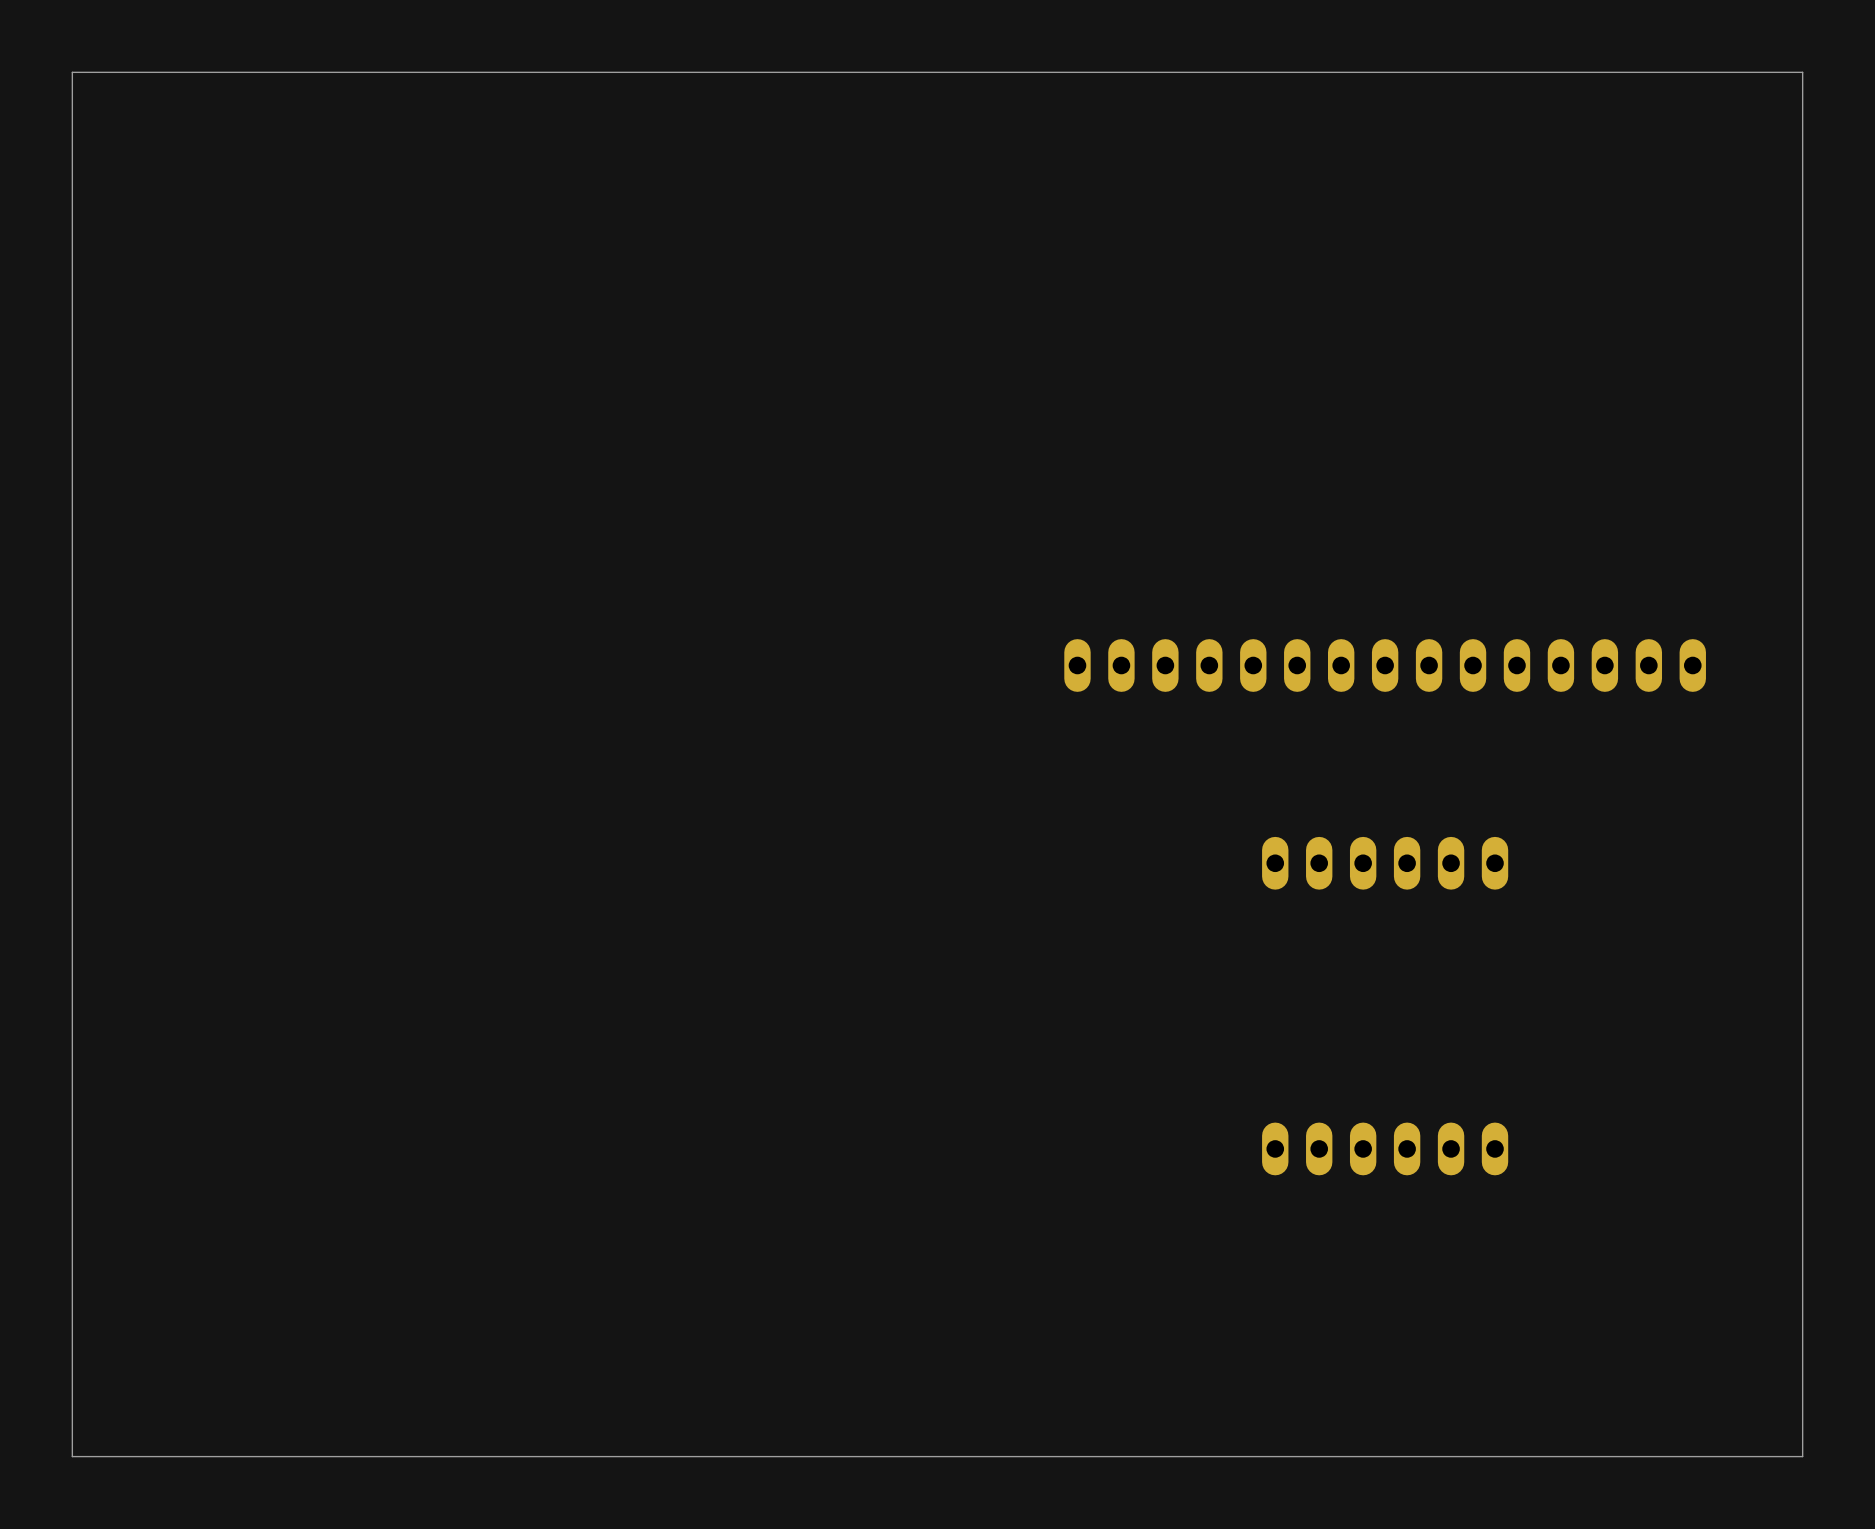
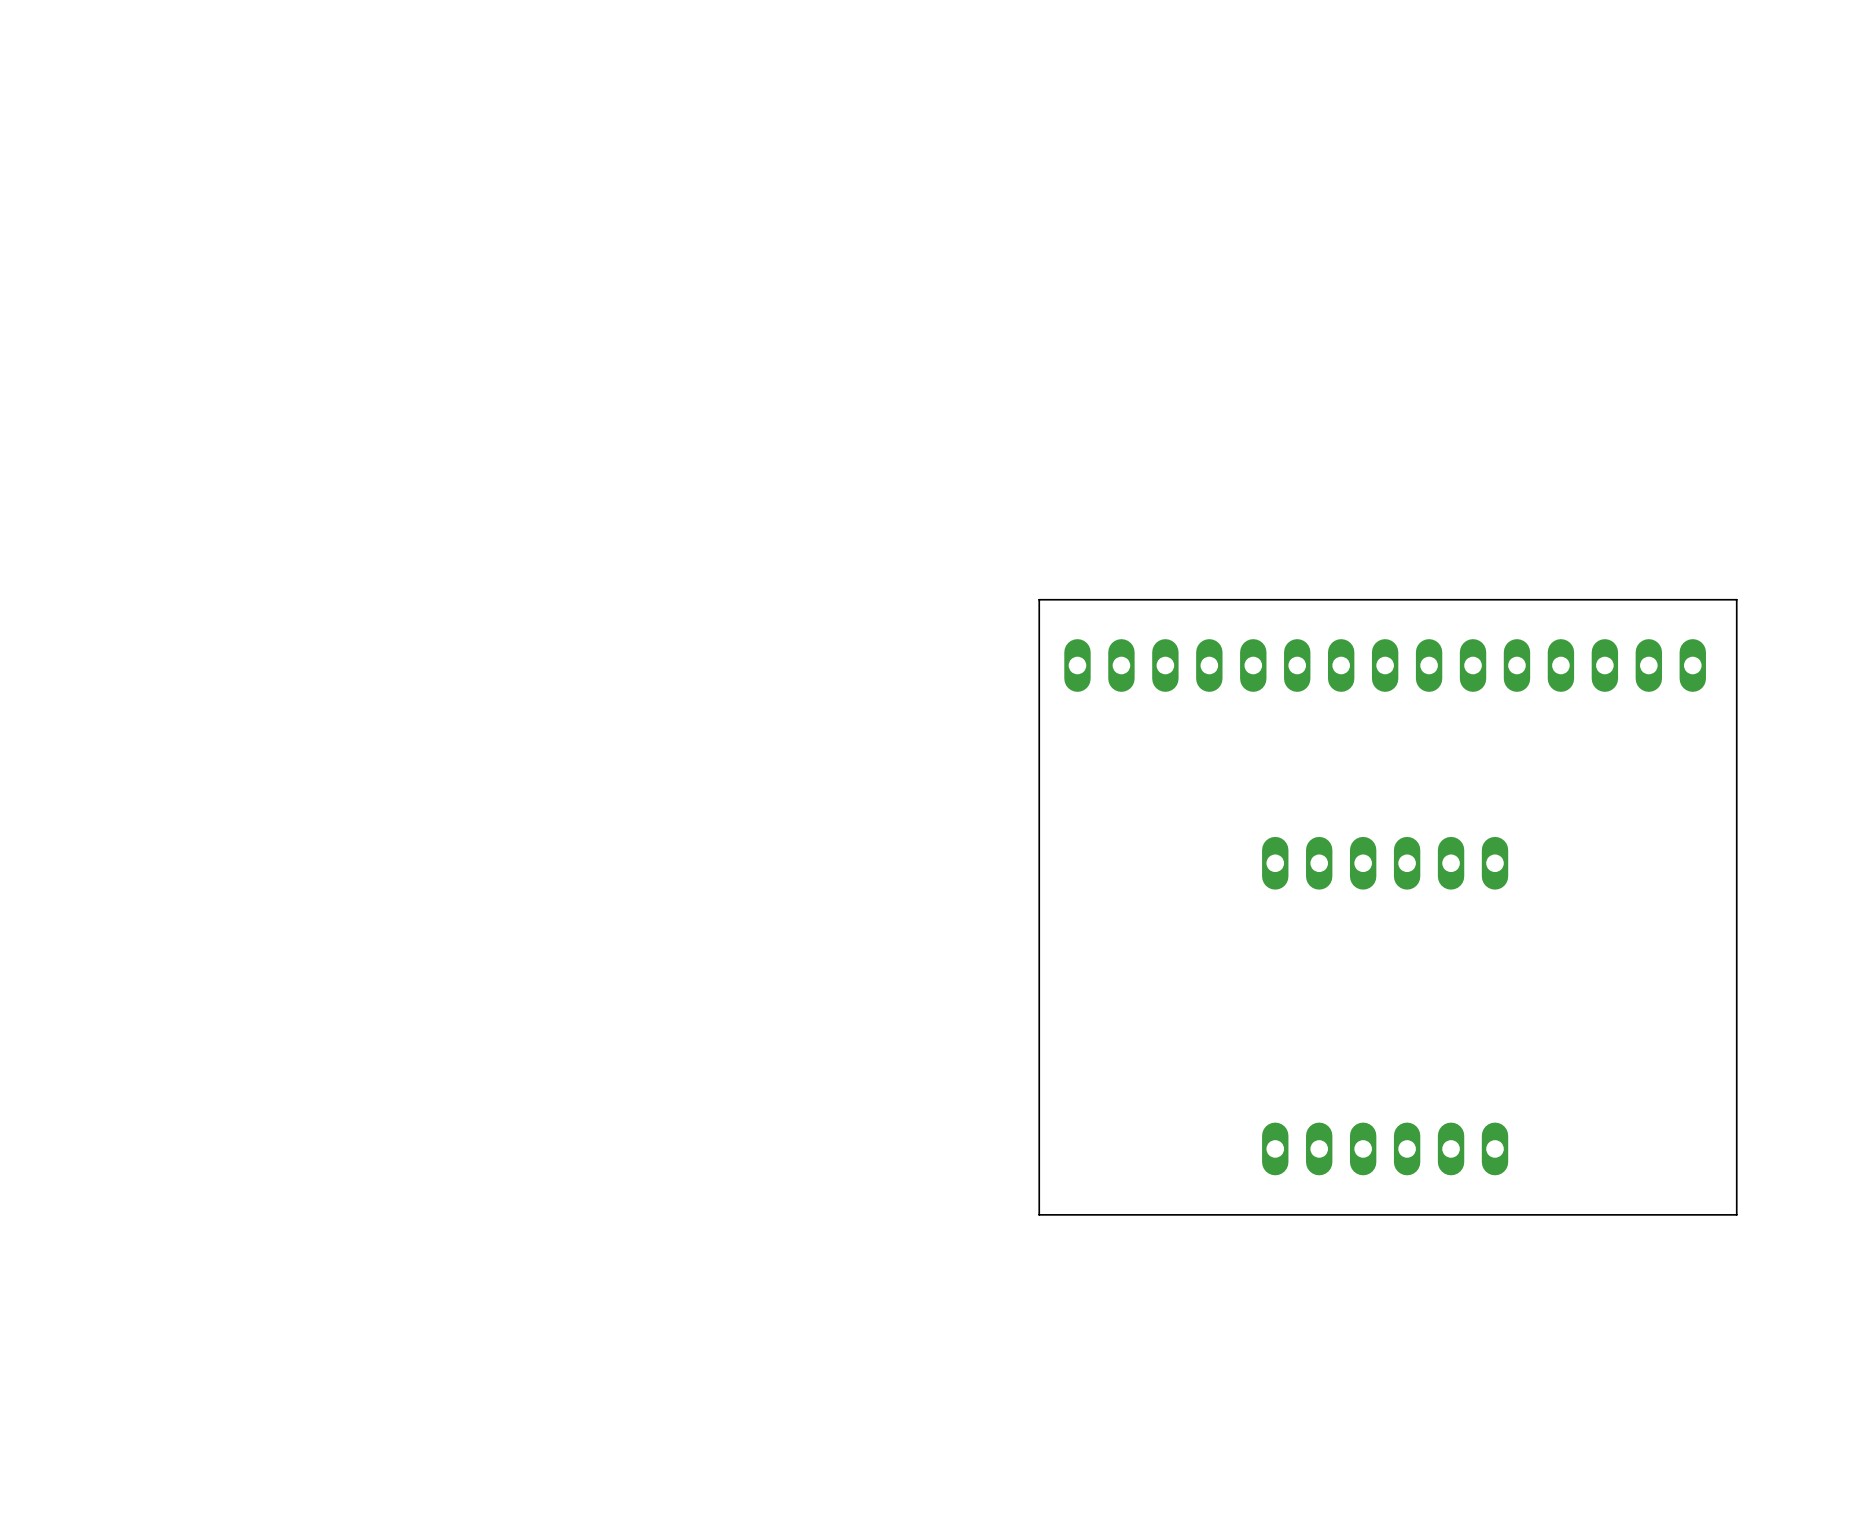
board edge: (1802, 72) (72, 72) (72, 1456) (1802, 1456) (1802, 72) -> none
board edge: none -> (1736, 599) (1039, 599) (1039, 1214) (1736, 1214) (1736, 599)

